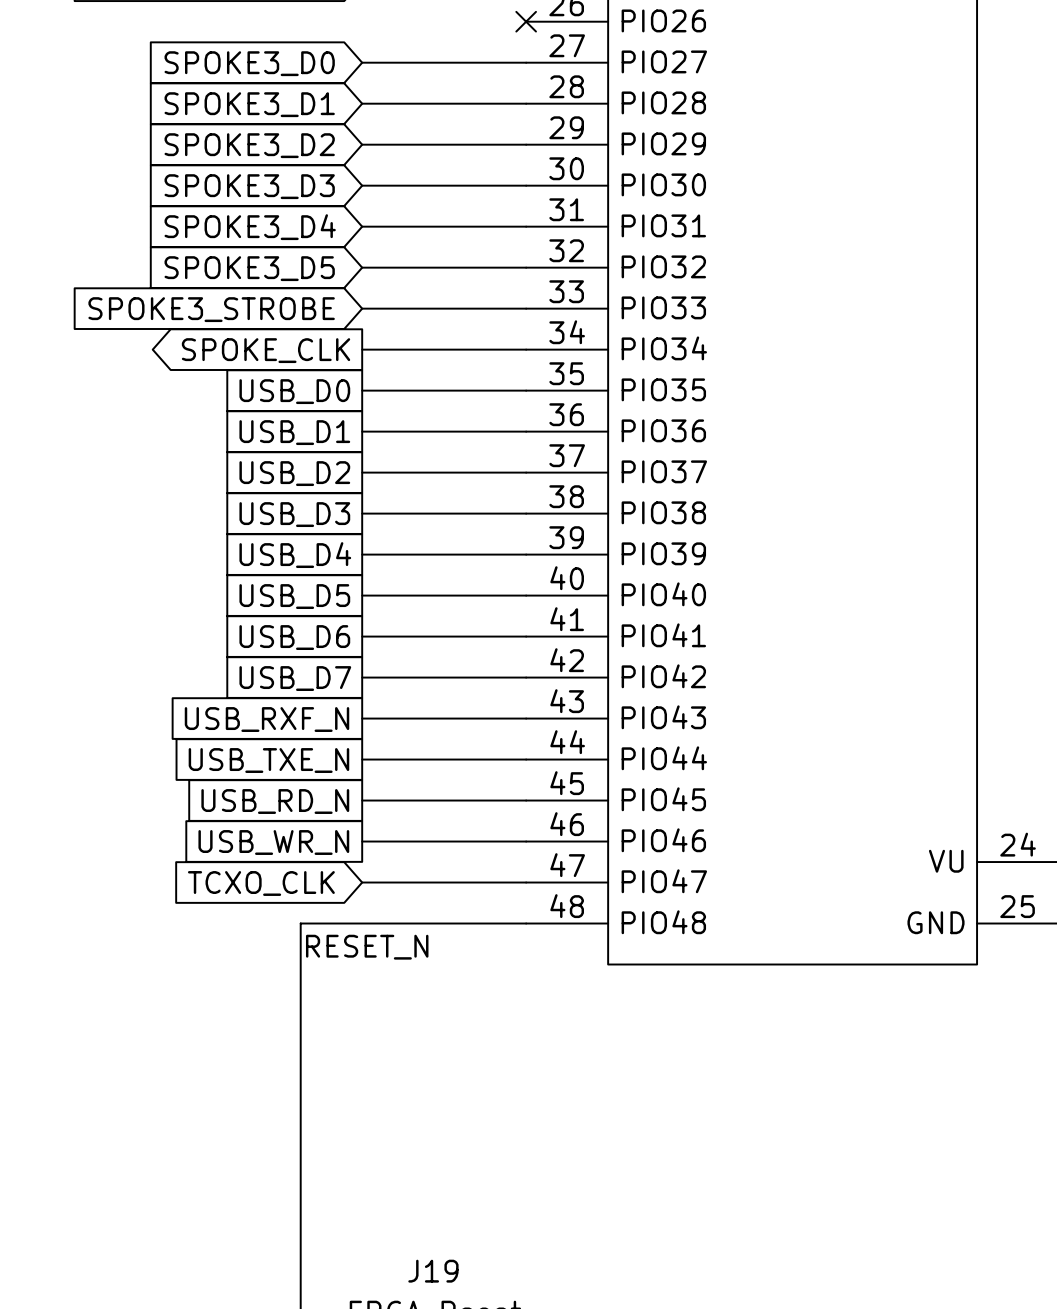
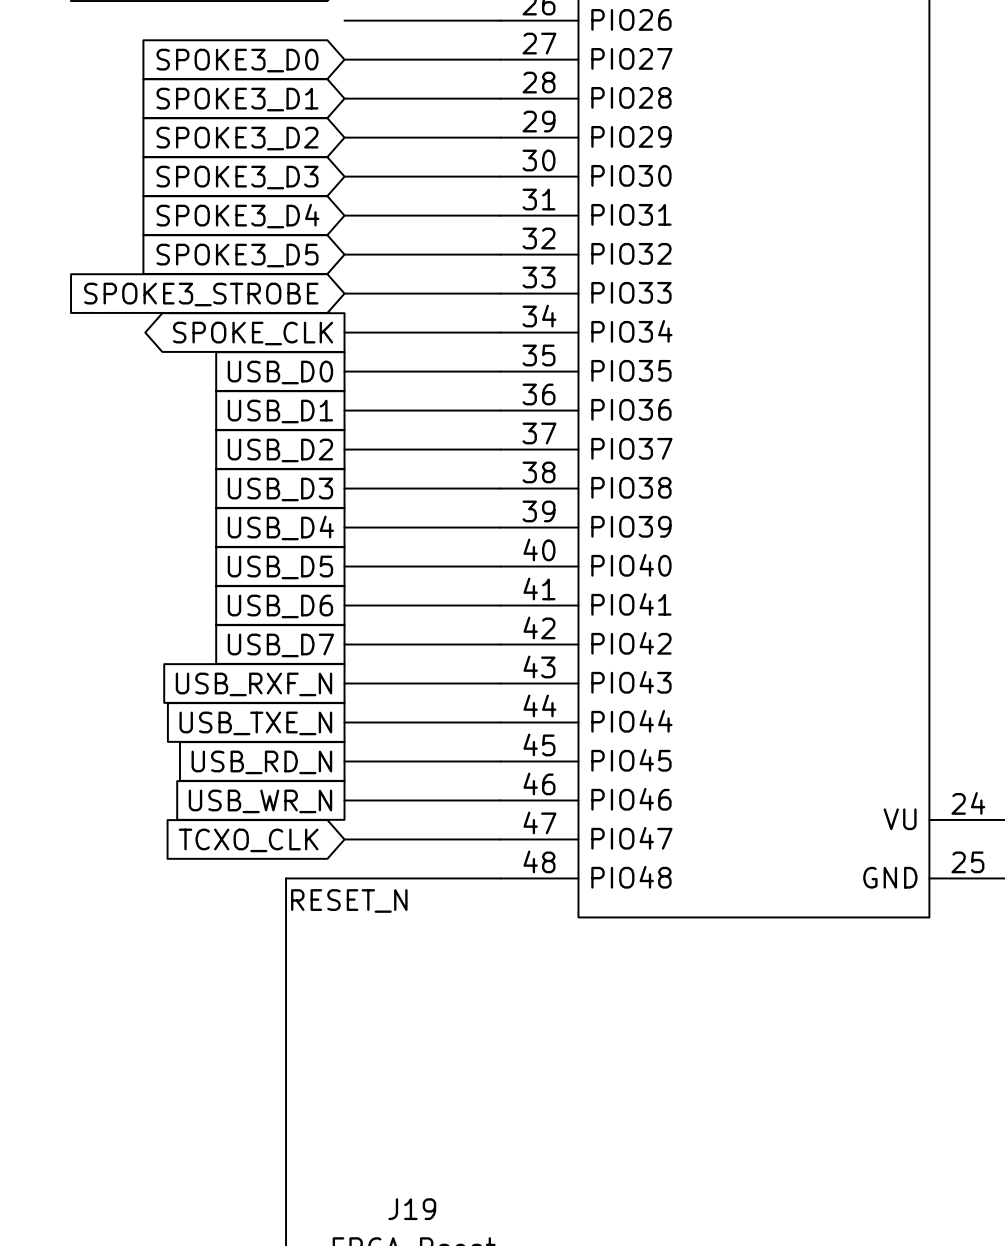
wire: none -> (344, 20) (500, 20)
no-connect mark: (526, 21) -> none

